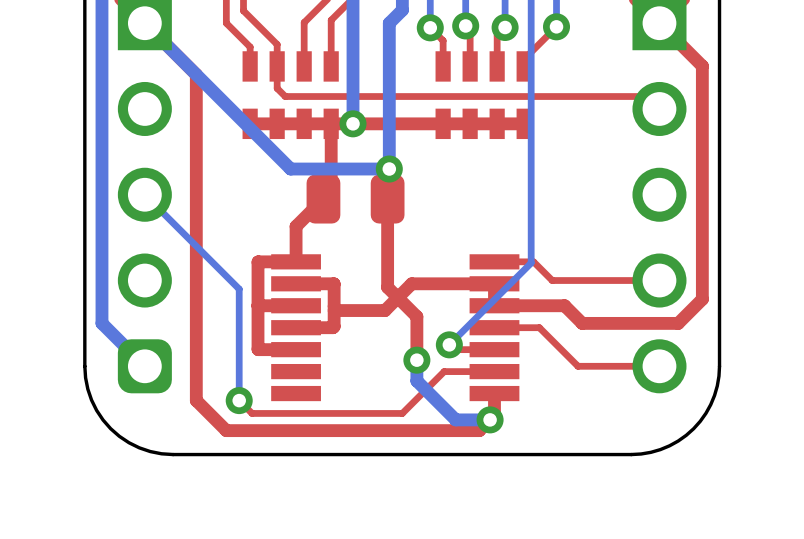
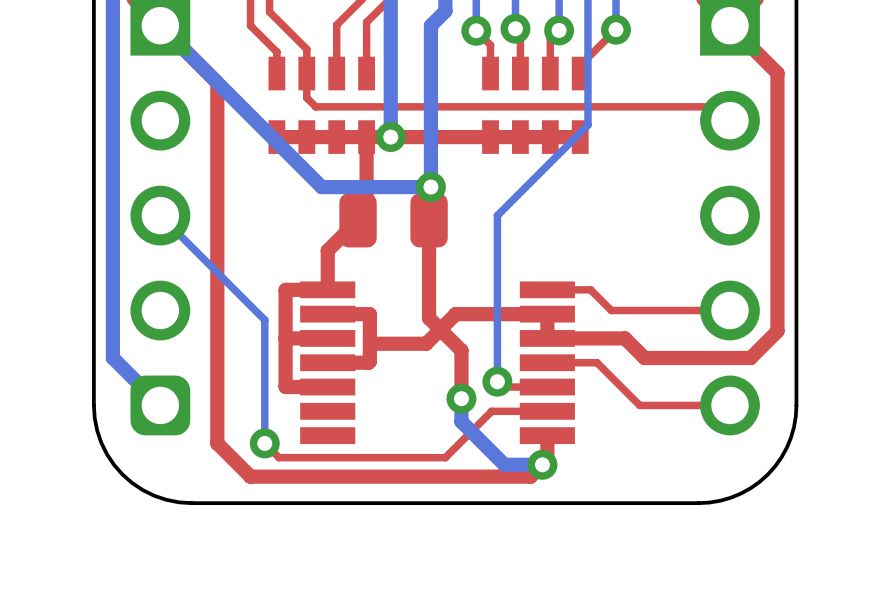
bottom track: (531, 112) (531, 263) (449, 344) -> (587, 124) (497, 215) (497, 381)

